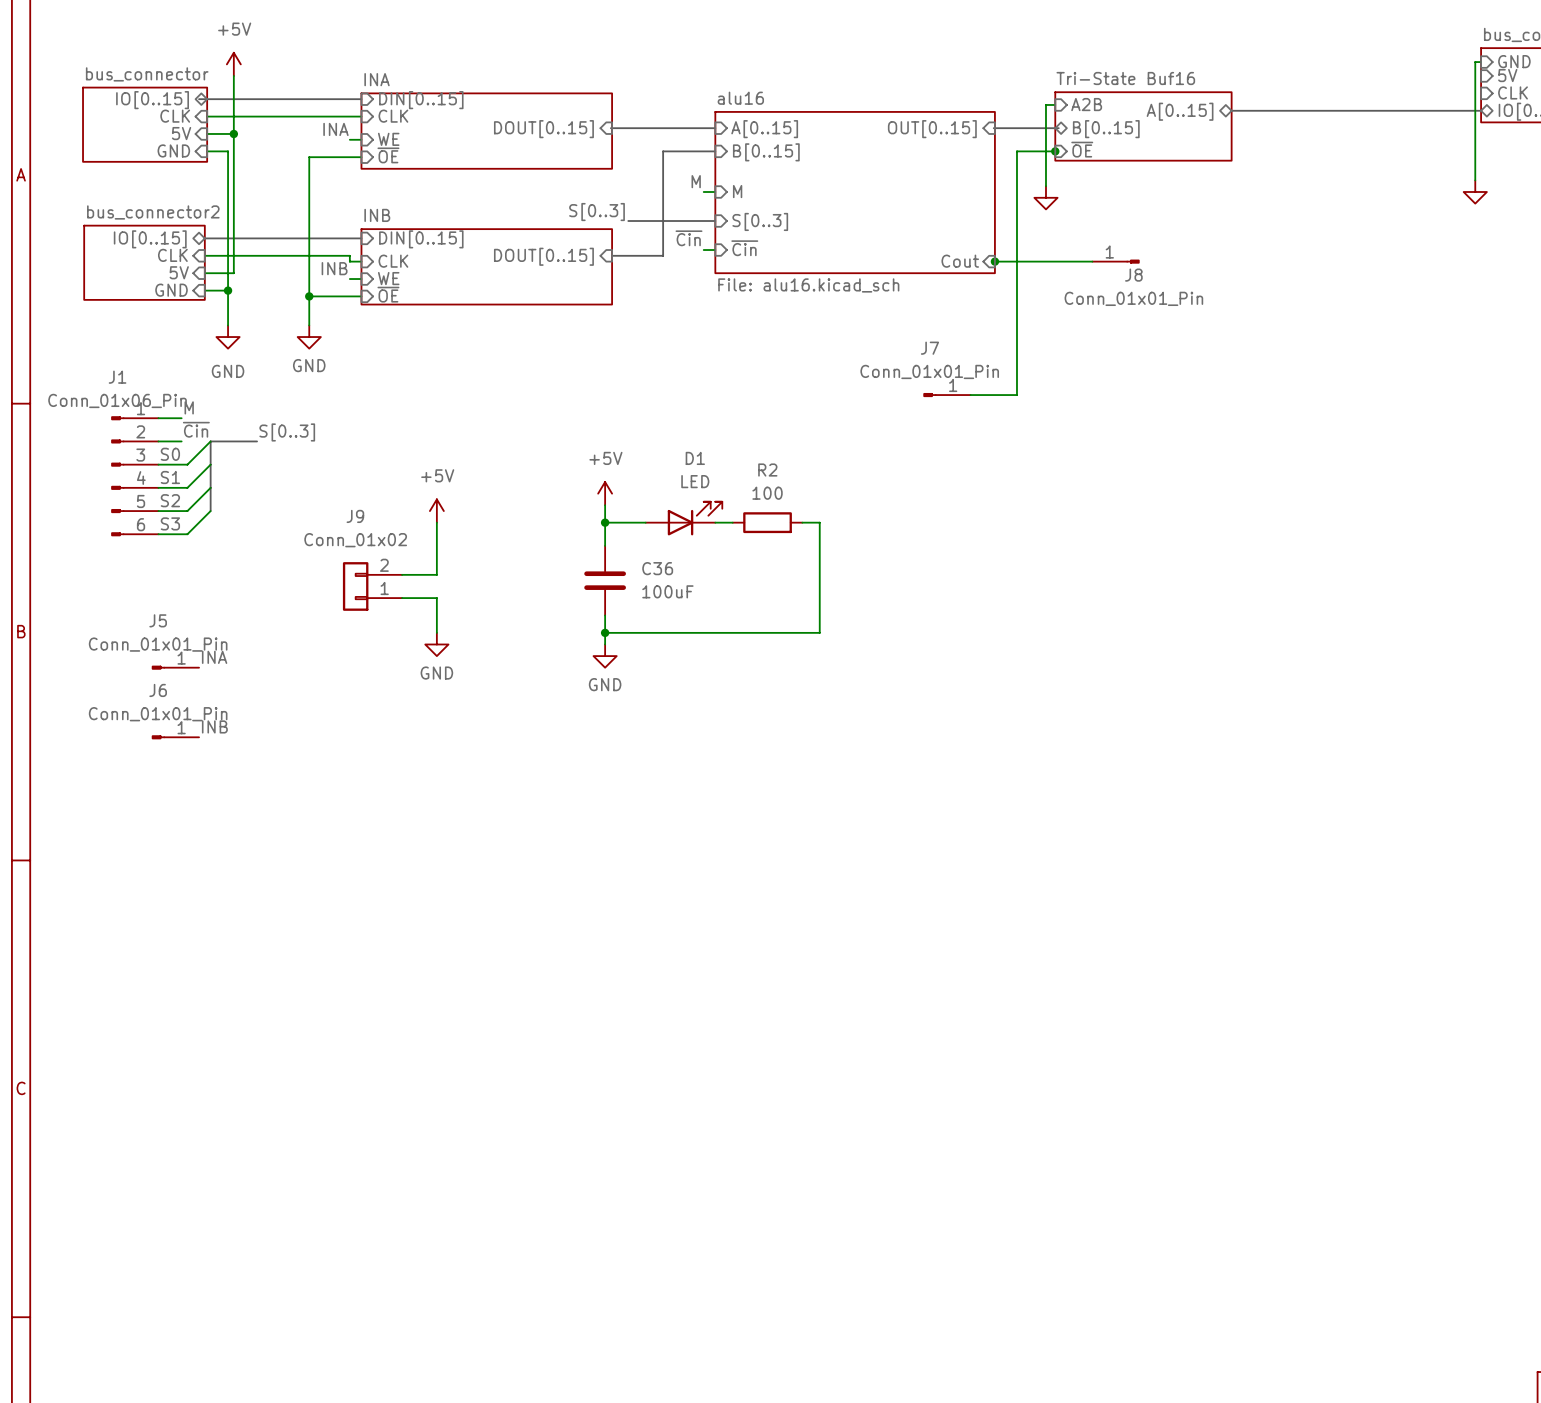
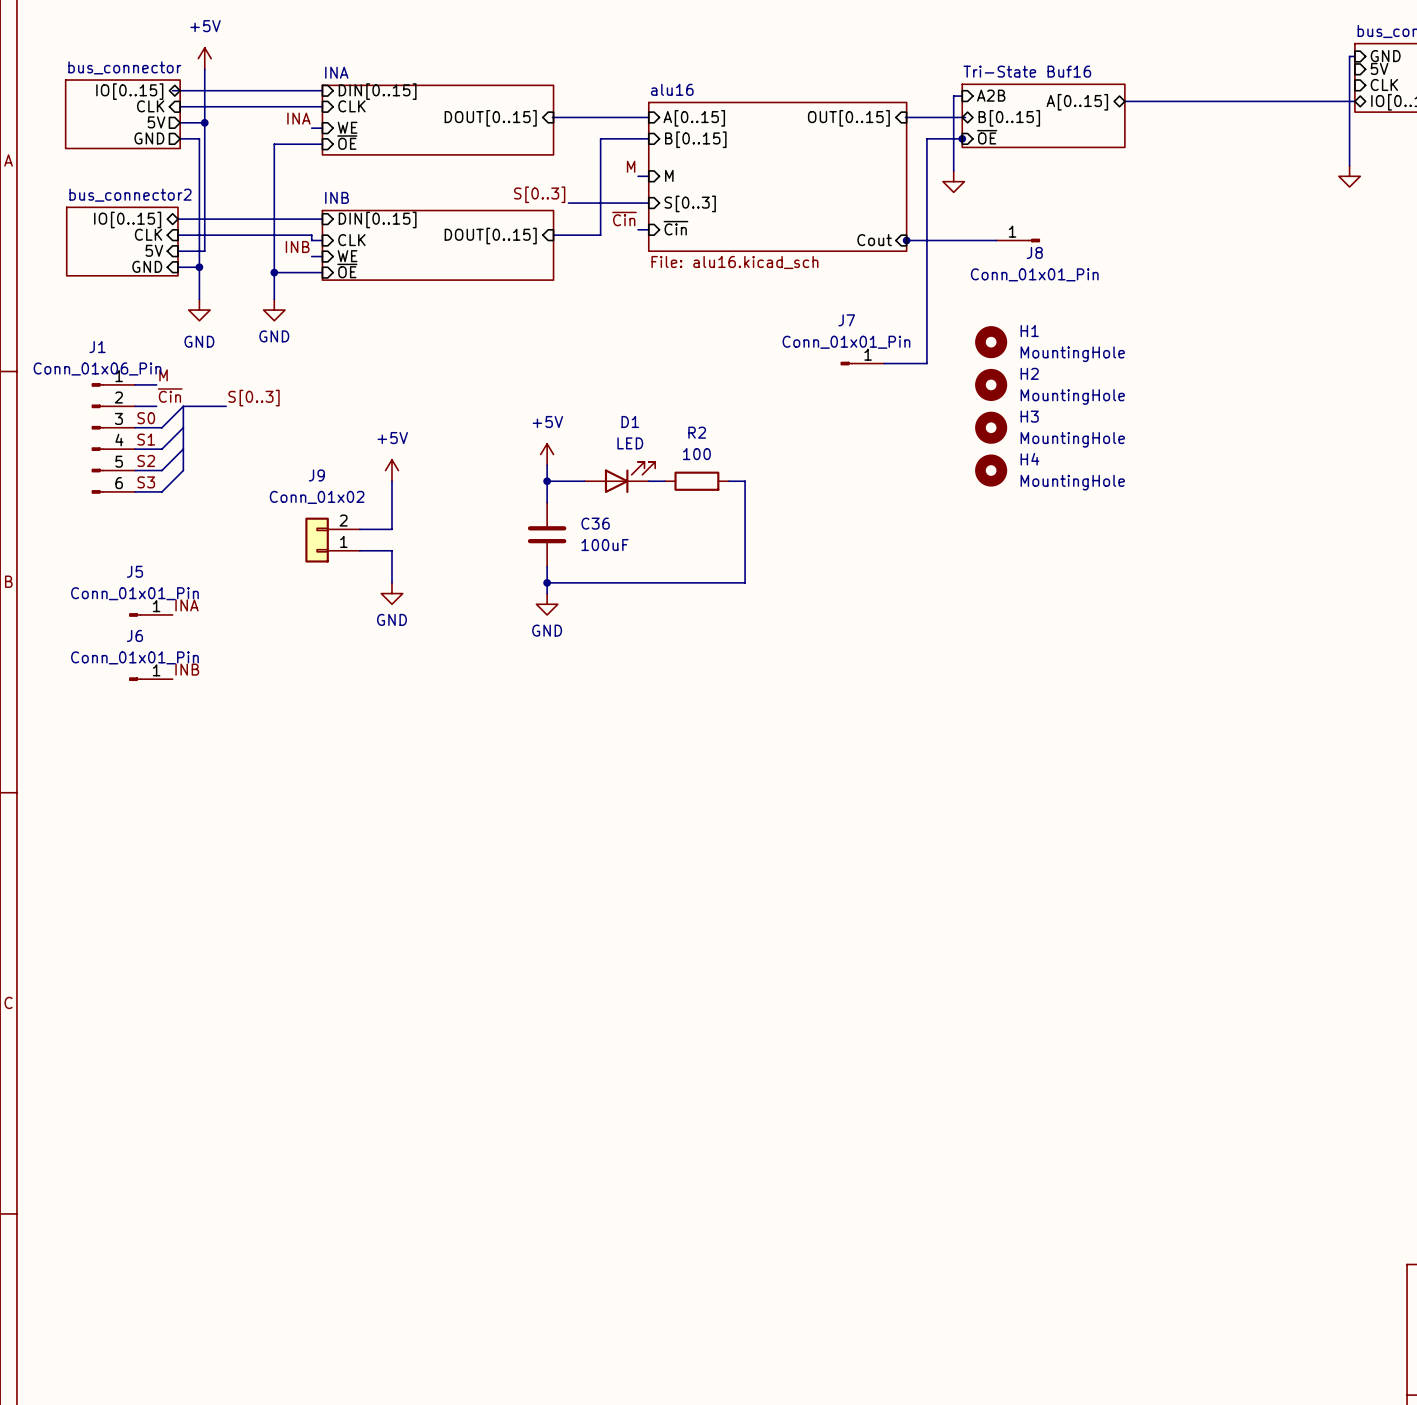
sheet pin shape: input (181, 133) -> output (156, 122)
sheet pin shape: input (173, 150) -> output (149, 138)
H1: none -> MountingHole (991, 342)
H2: none -> MountingHole (991, 384)
H3: none -> MountingHole (991, 427)
H4: none -> MountingHole (991, 470)

